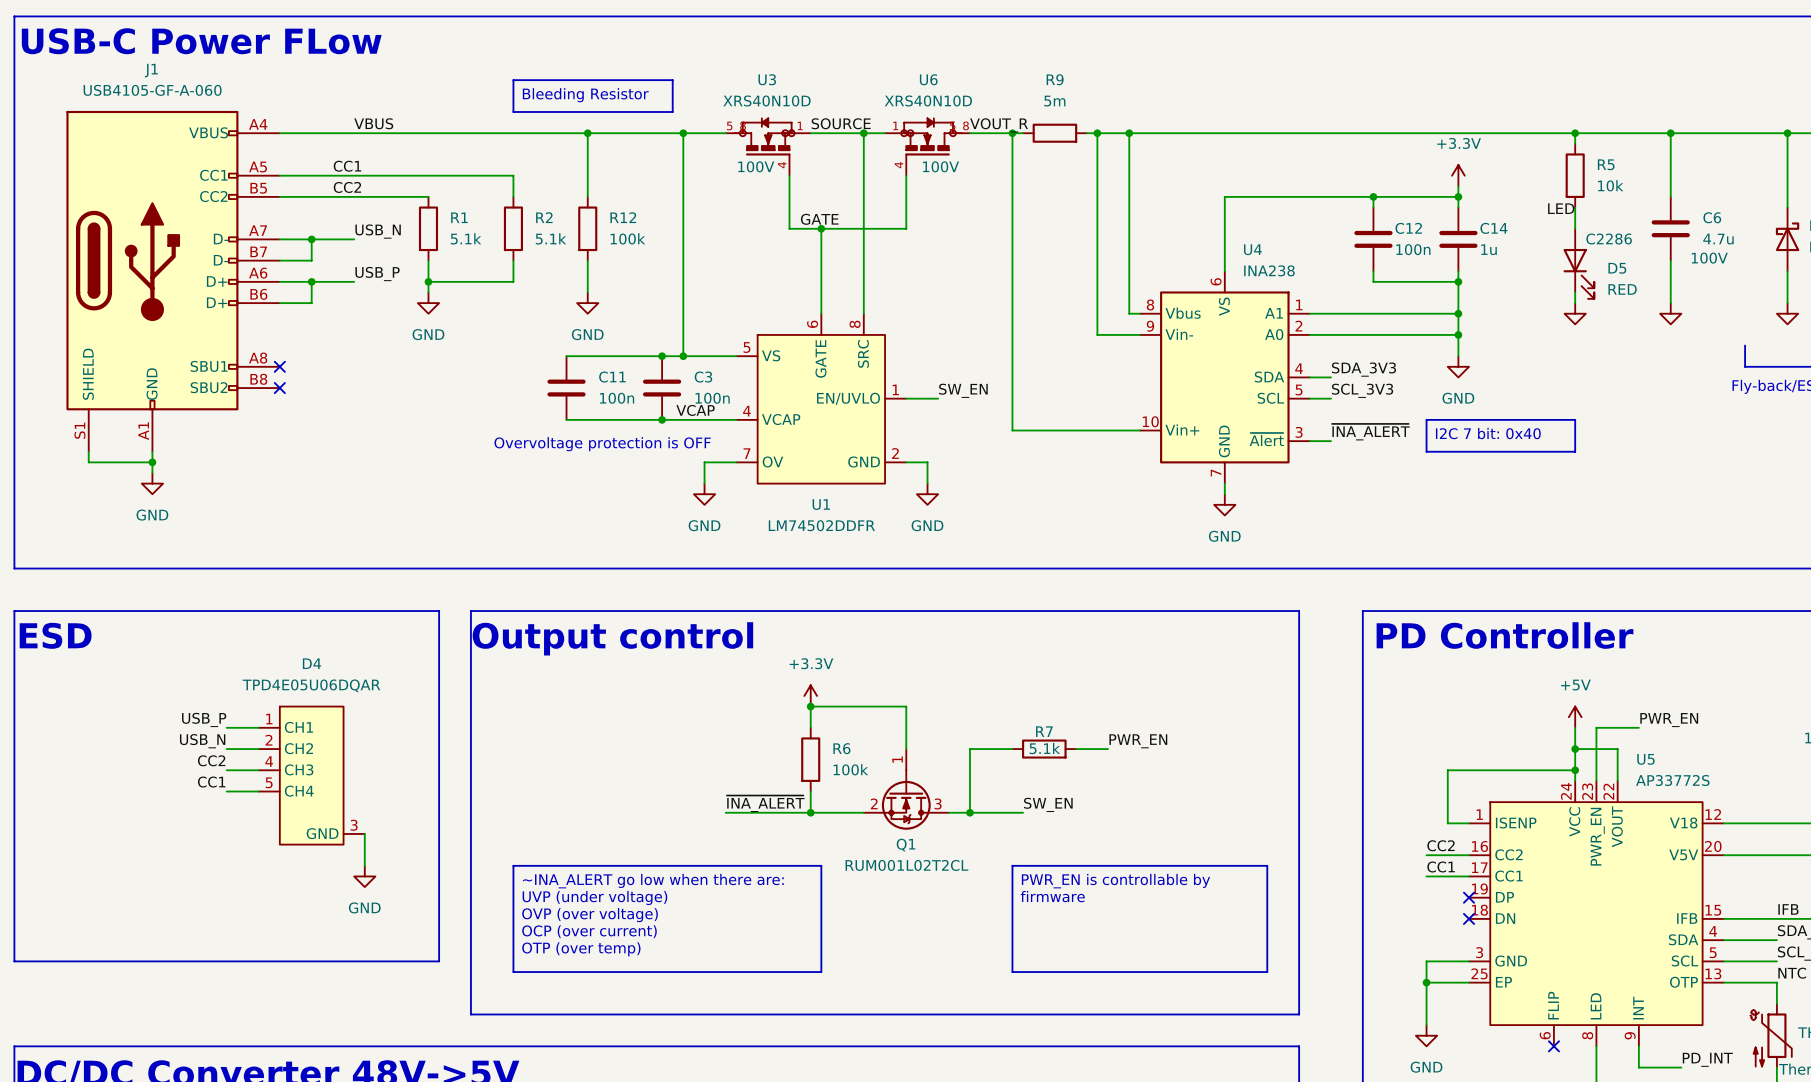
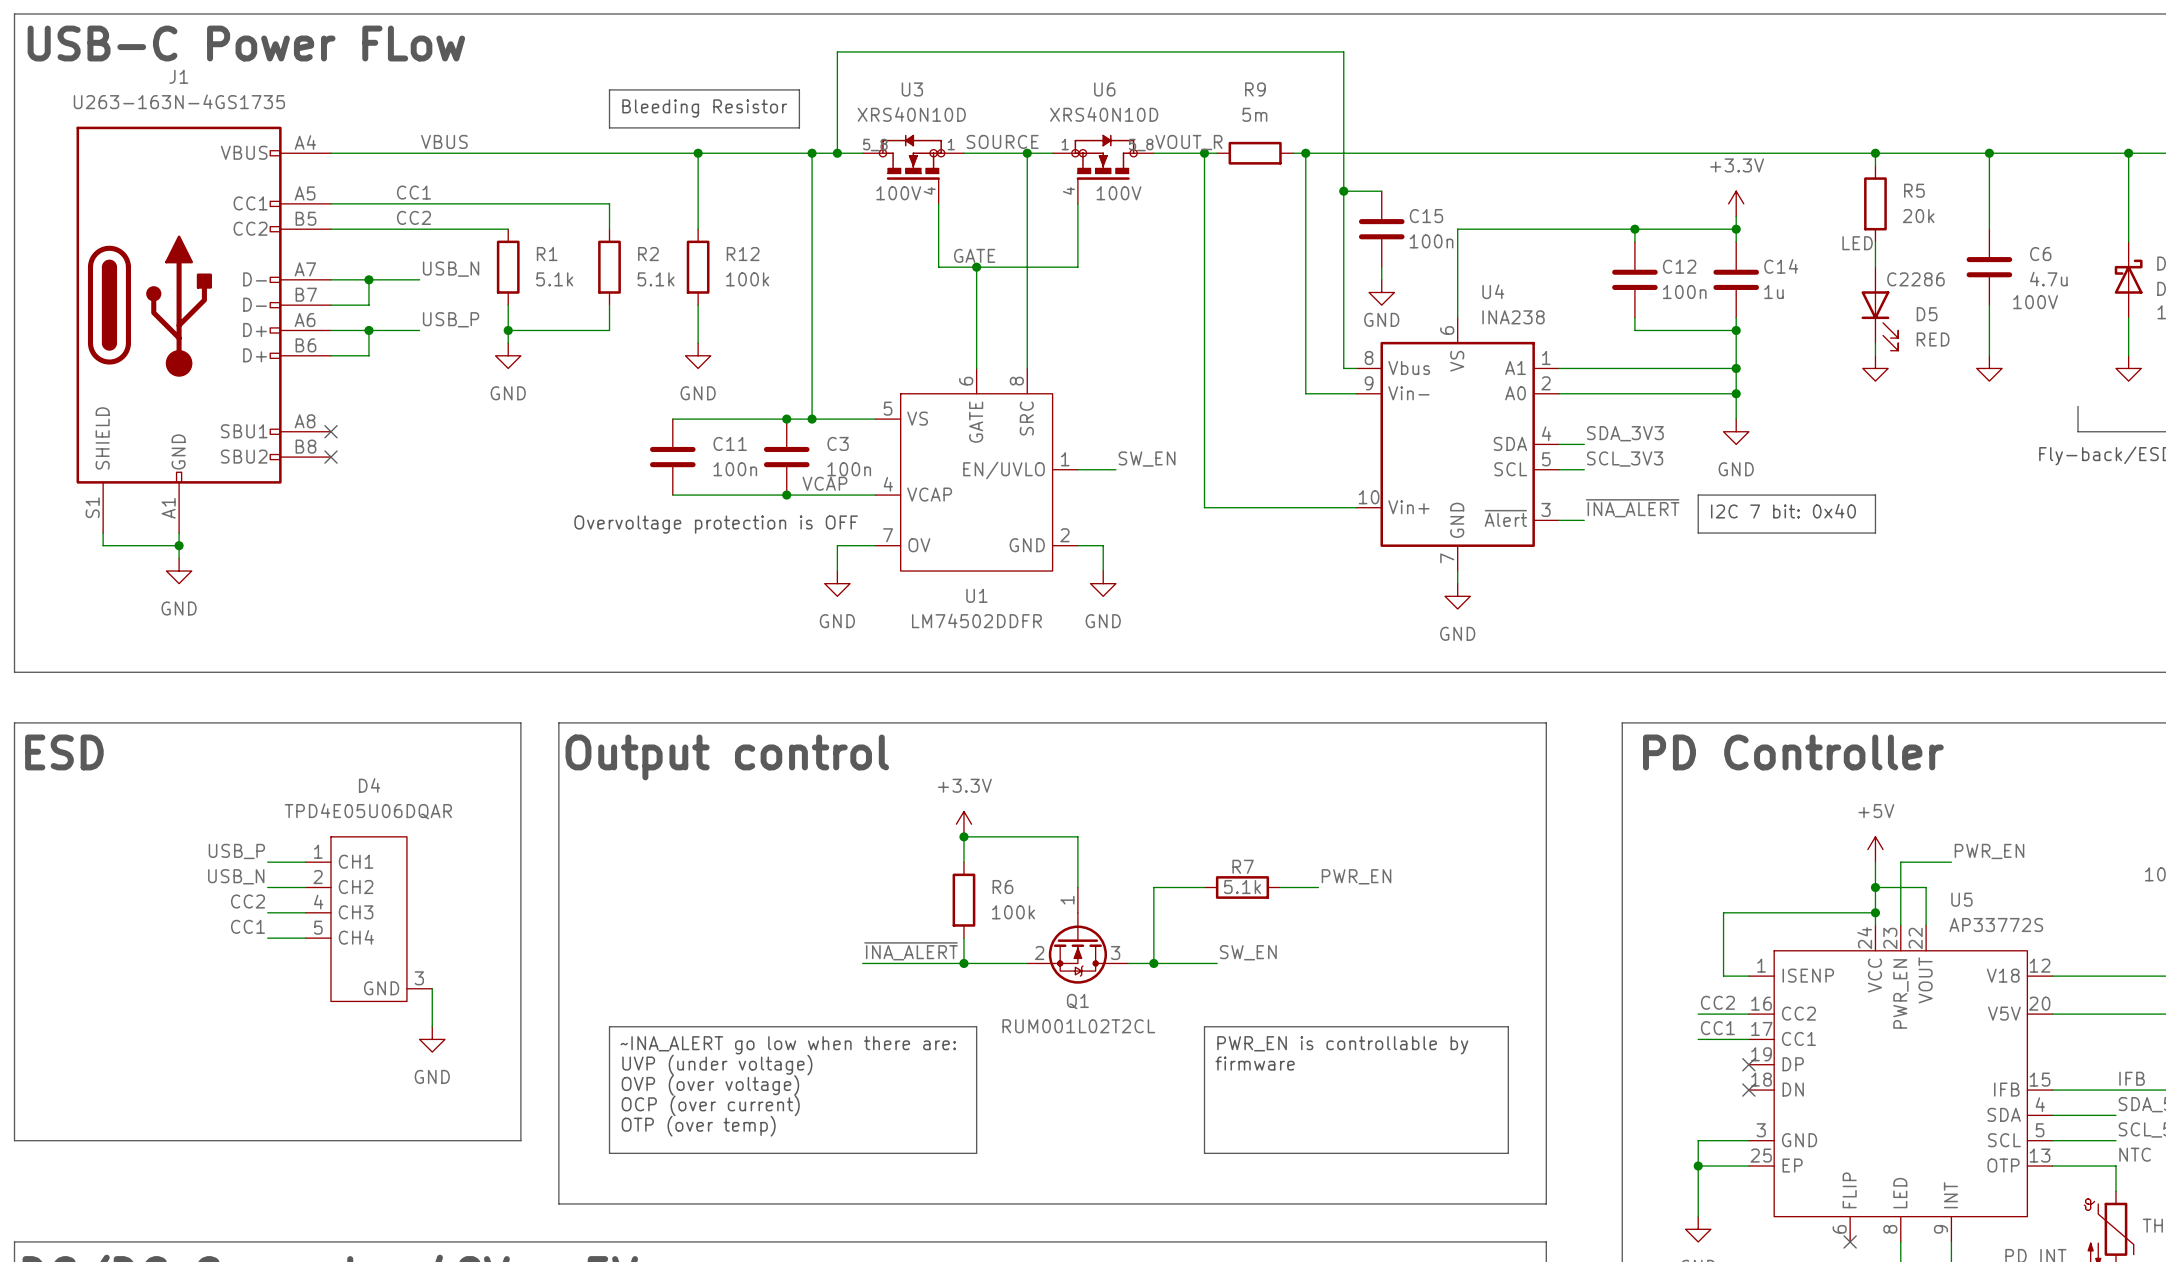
J1 value: USB4105-GF-A-060 (152, 90) -> U263-163N-4GS1735 (179, 101)
wire: none -> (837, 153) (837, 51) (1343, 51) (1343, 153)
junction: none -> (837, 153)
junction position: (1129, 133) -> (1343, 191)
wire: none -> (1343, 191) (1381, 191)
R5 value: 10k (1610, 185) -> 20k (1918, 216)
C15: none -> 100n (1381, 229)
wire: none -> (1381, 267) (1381, 279)
power symbol: none -> GND (1381, 292)

